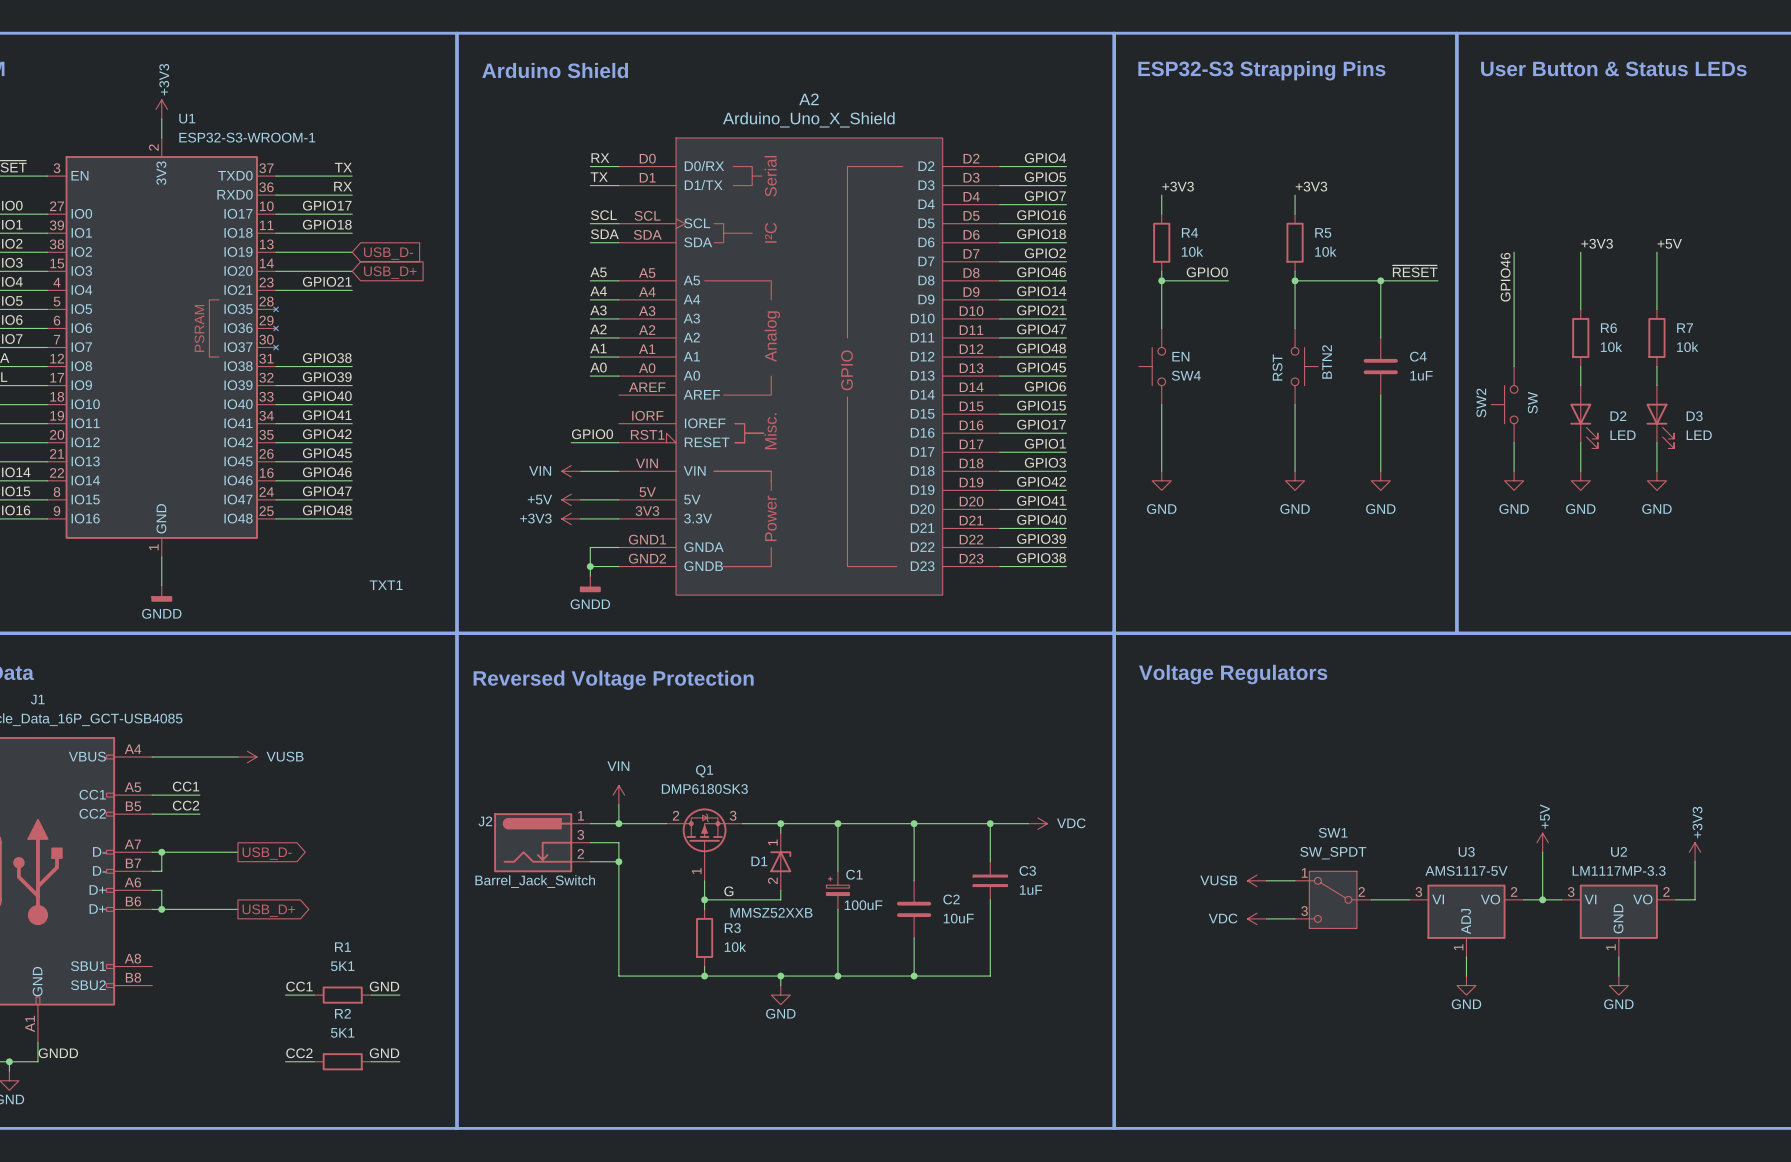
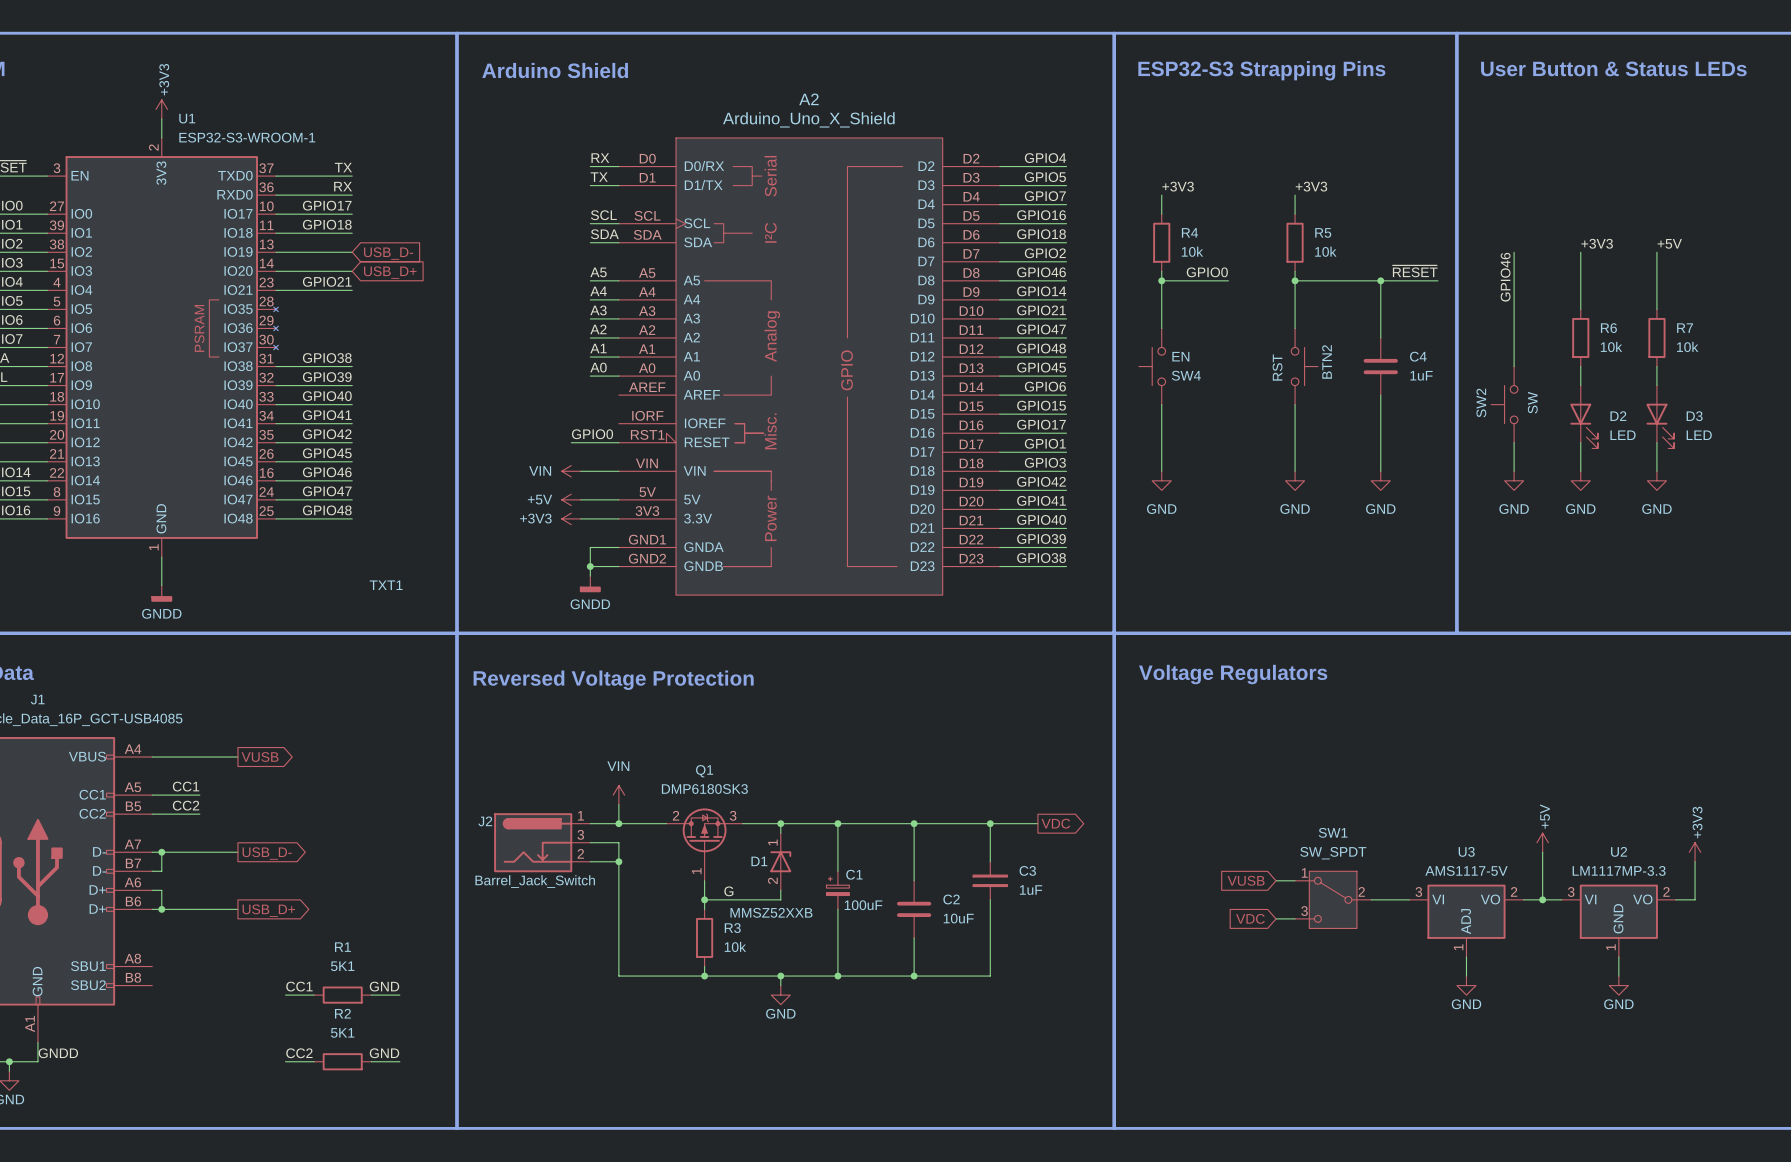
power symbol: VUSB (247, 757) -> none
global label: none -> VUSB (260, 757)
power symbol: VDC (1037, 823) -> none
global label: none -> VDC (1055, 823)
global label: none -> VUSB (1246, 880)
power symbol: VUSB (1256, 880) -> none
wire: (1266, 880) (1276, 880) -> none
global label: none -> VDC (1250, 918)
power symbol: VDC (1256, 918) -> none
wire: (1266, 918) (1276, 918) -> none

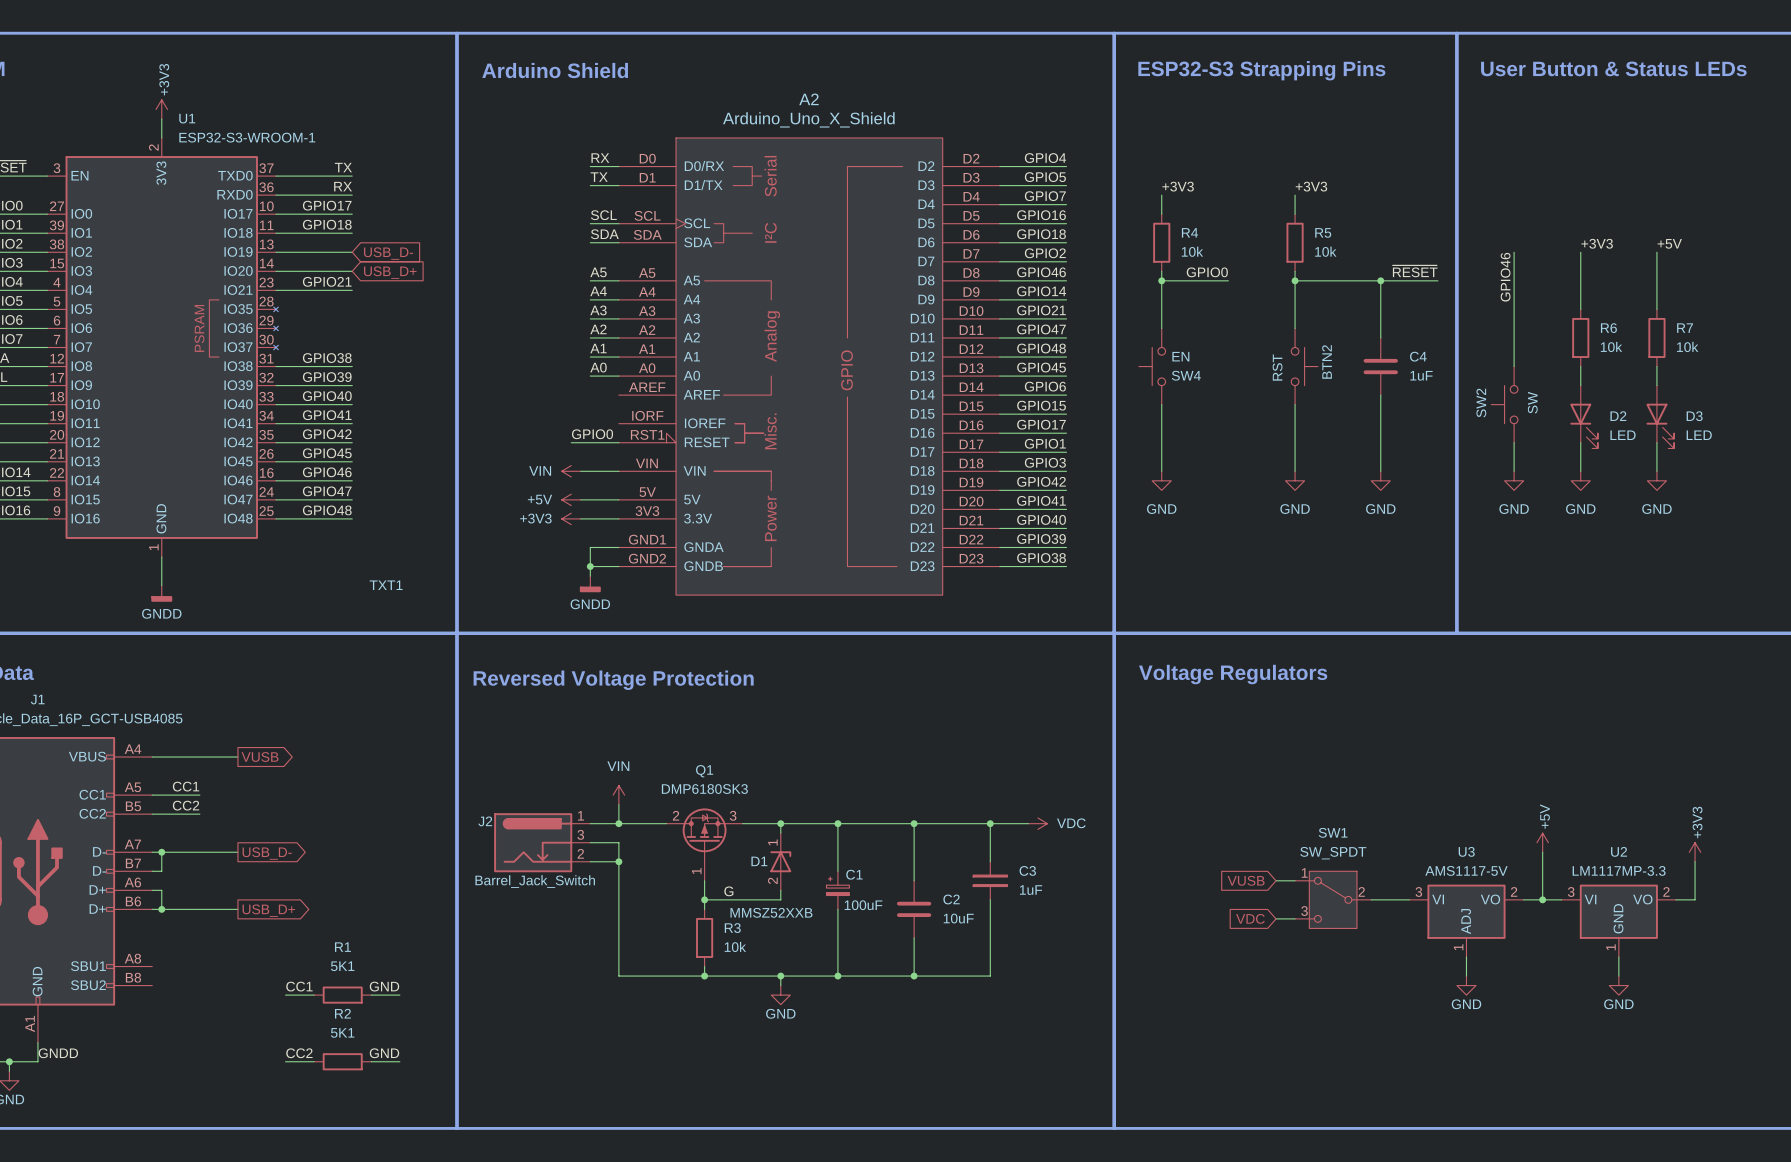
power symbol: none -> VDC (1037, 823)
global label: VDC (1055, 823) -> none

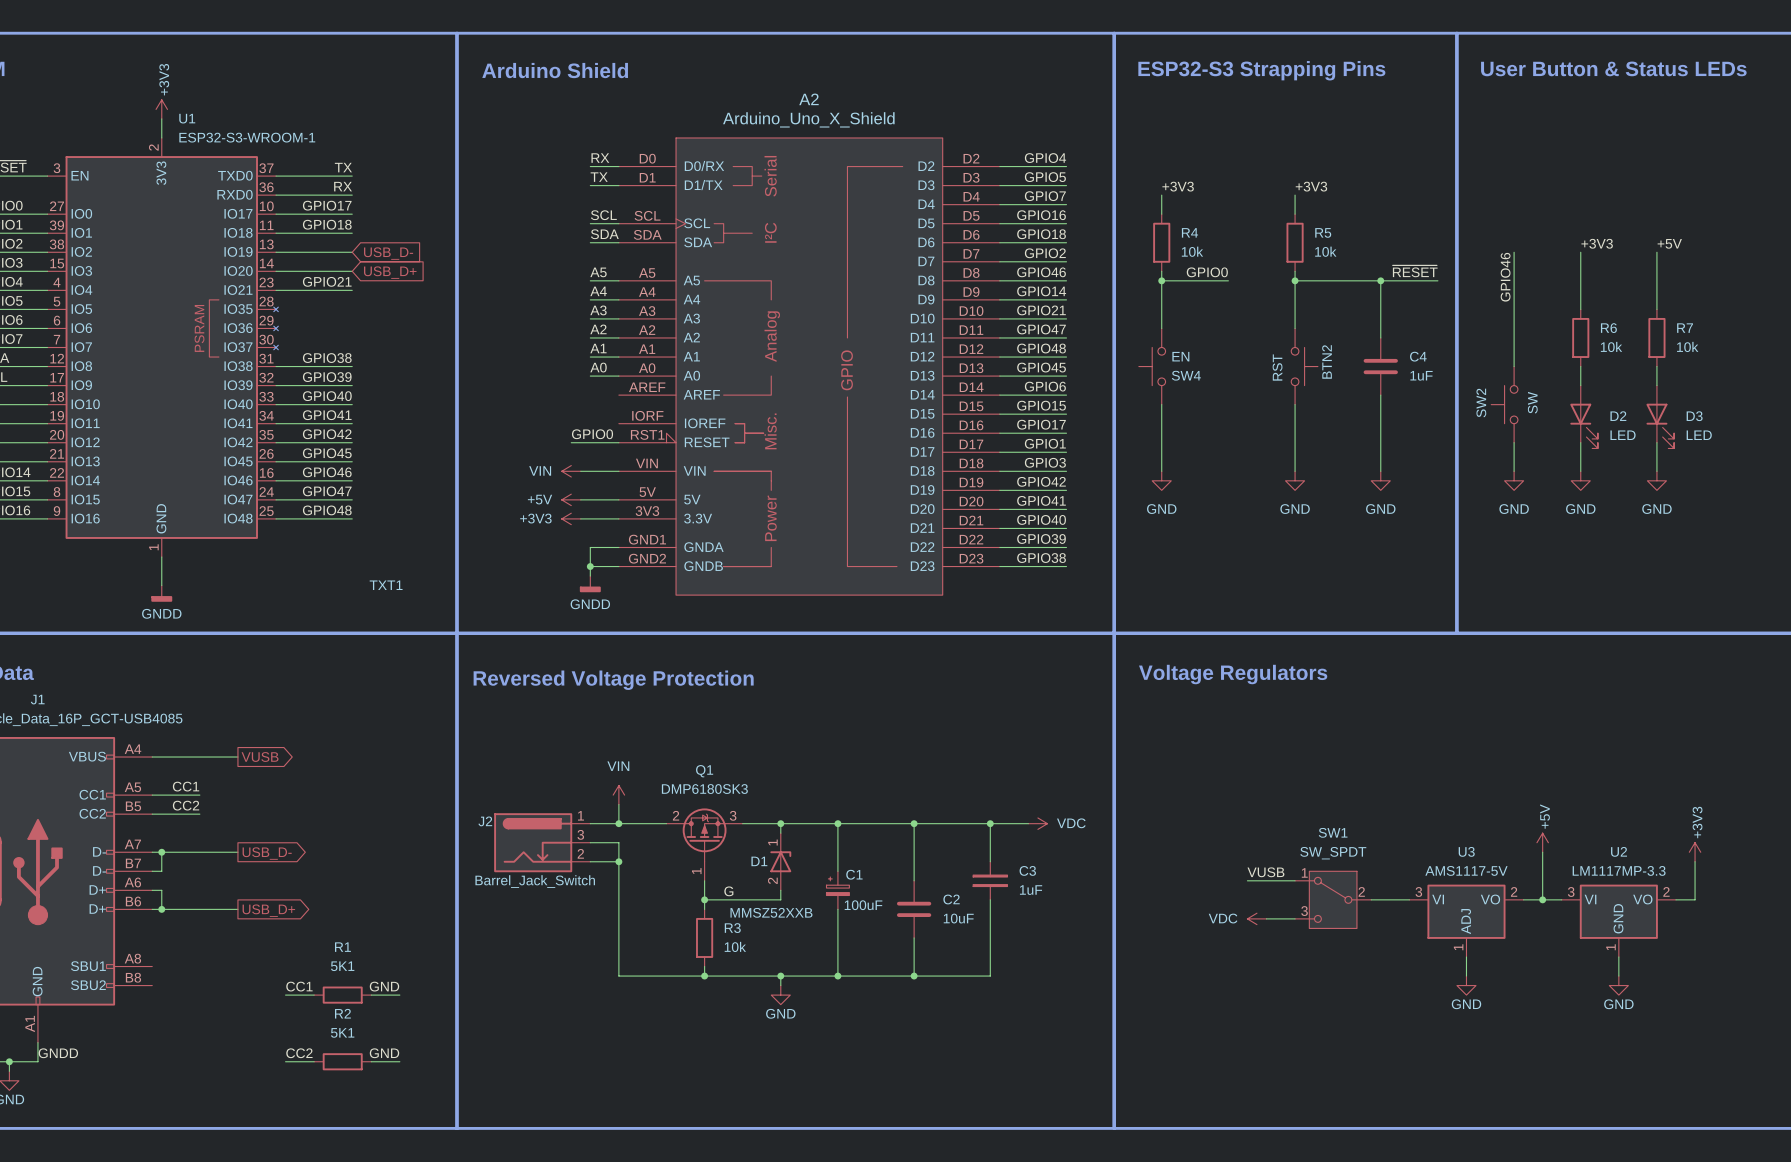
label: none -> VUSB (1265, 872)
global label: VUSB (1246, 880) -> none
wire: none -> (1247, 880) (1276, 880)
global label: VDC (1250, 918) -> none
power symbol: none -> VDC (1256, 918)
wire: none -> (1266, 918) (1276, 918)

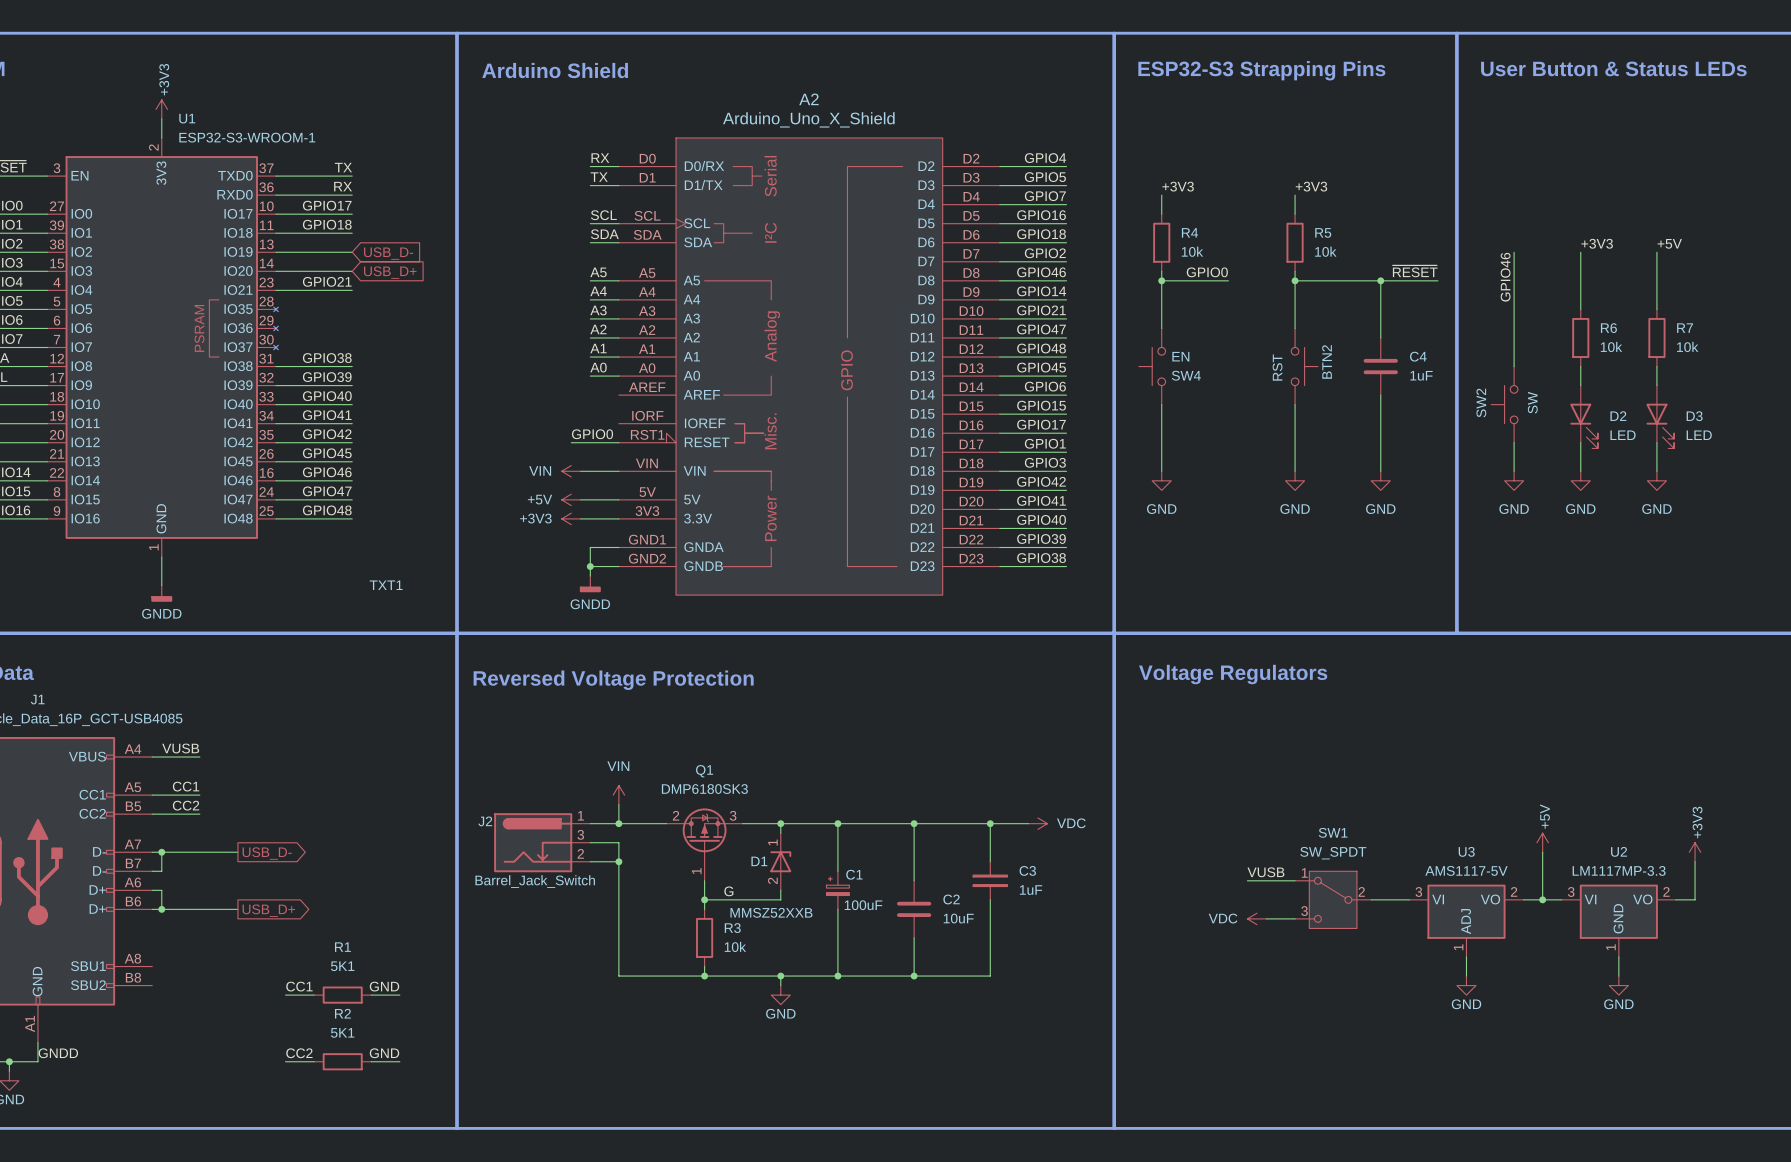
label: none -> VUSB (180, 748)
wire: (199, 757) (237, 757) -> none
global label: VUSB (260, 757) -> none

